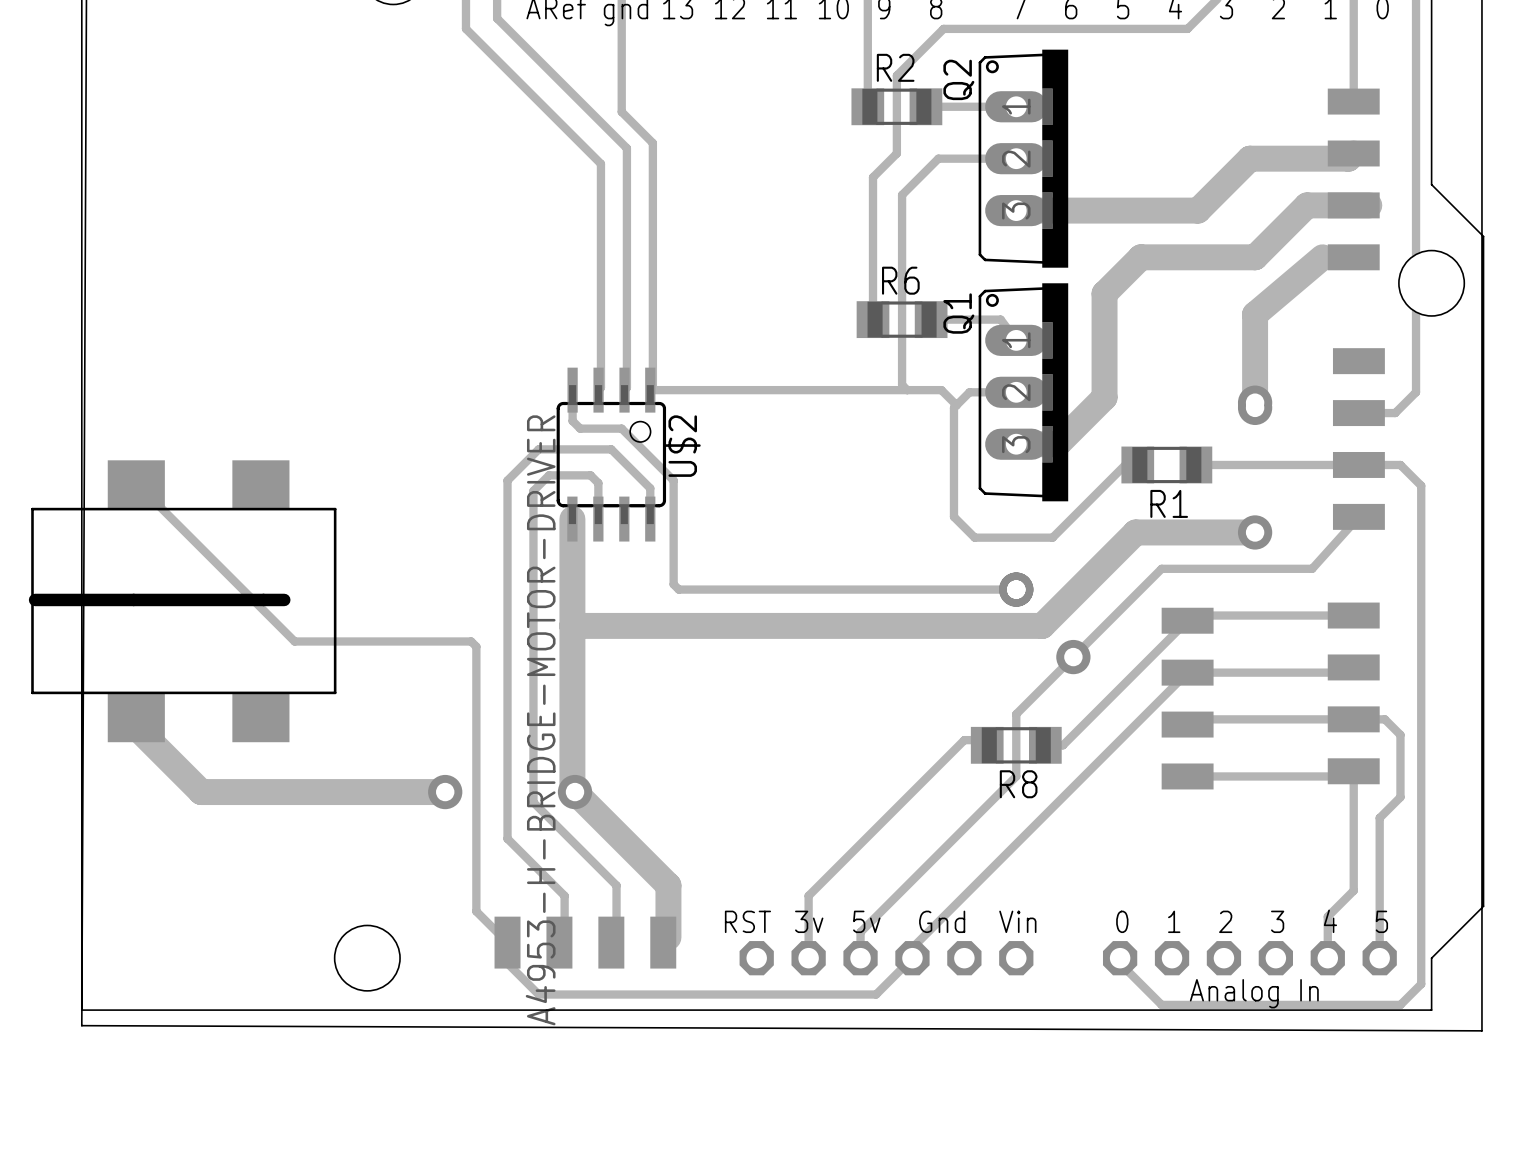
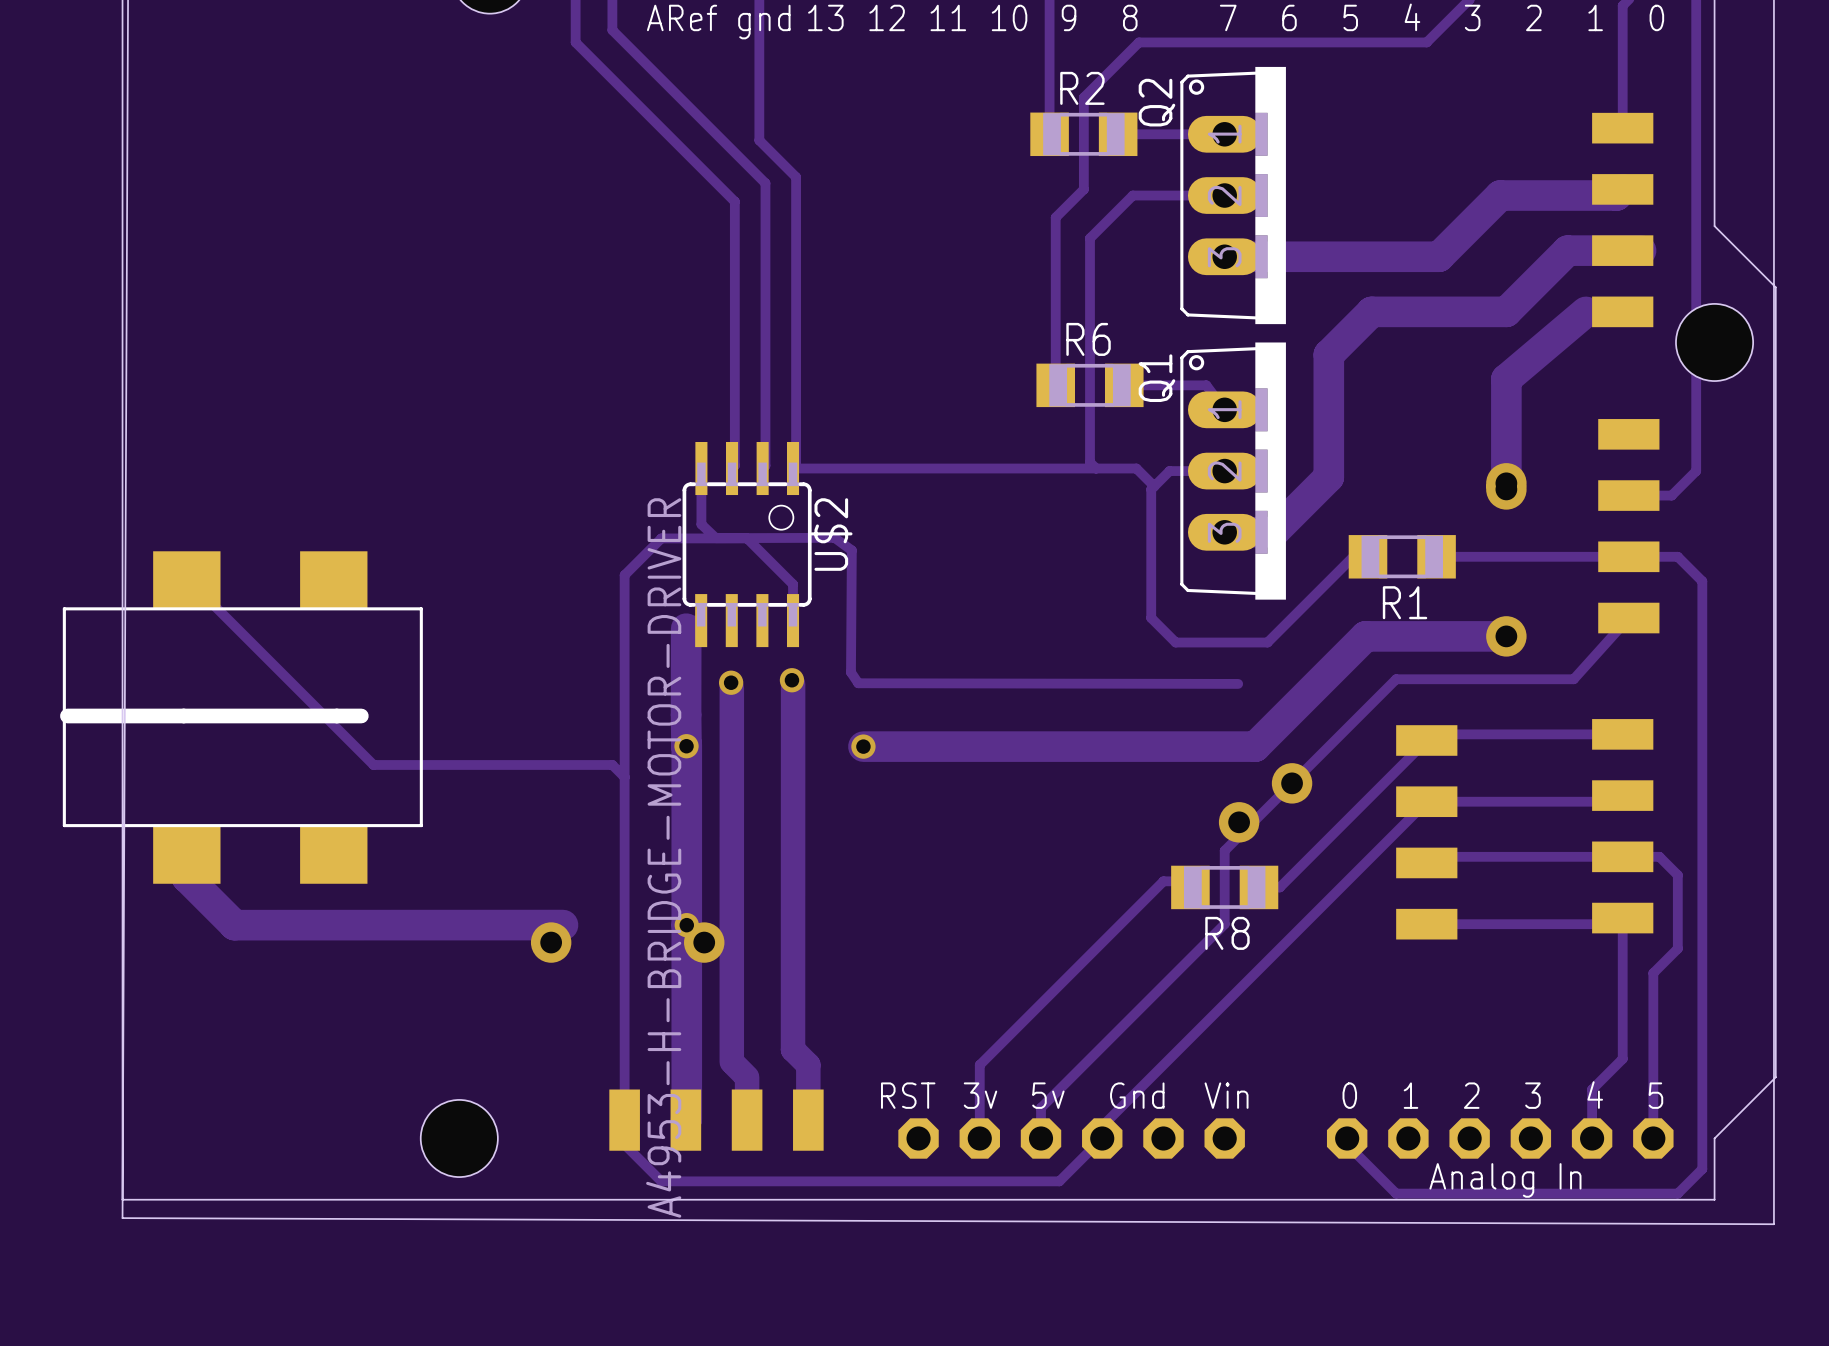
track: (572, 421) (580, 428) (621, 428) (673, 480) (673, 584) (678, 589) (1016, 589) -> (701, 504) (701, 524) (715, 538) (834, 537) (851, 550) (850, 672) (858, 683) (1238, 683)
track: (572, 519) (572, 789) (668, 885) (668, 937) (663, 942) -> (793, 684) (793, 1049) (808, 1065) (808, 1120)
track: none -> (701, 620) (689, 620) (686, 628) (685, 1120)
track: (598, 519) (598, 483) (590, 475) (549, 475) (533, 490) (533, 802) (616, 885) (616, 937) (611, 942) -> (731, 688) (731, 1061) (747, 1077) (747, 1120)
via: none -> (791, 680)
via: none -> (731, 682)
via position: (1016, 589) -> (1239, 822)
via: none -> (686, 746)
track: (572, 625) (709, 625) -> none
via: none -> (863, 746)
track: (471, 641) (476, 646) (476, 911) (507, 942) -> (581, 764) (612, 764) (624, 777)
track: (136, 727) (201, 792) (445, 792) -> (186, 866) (186, 877) (234, 925) (563, 925)
via: none -> (686, 925)
track: (507, 838) (564, 895) (564, 937) (560, 941) -> (624, 997) (624, 1120)

